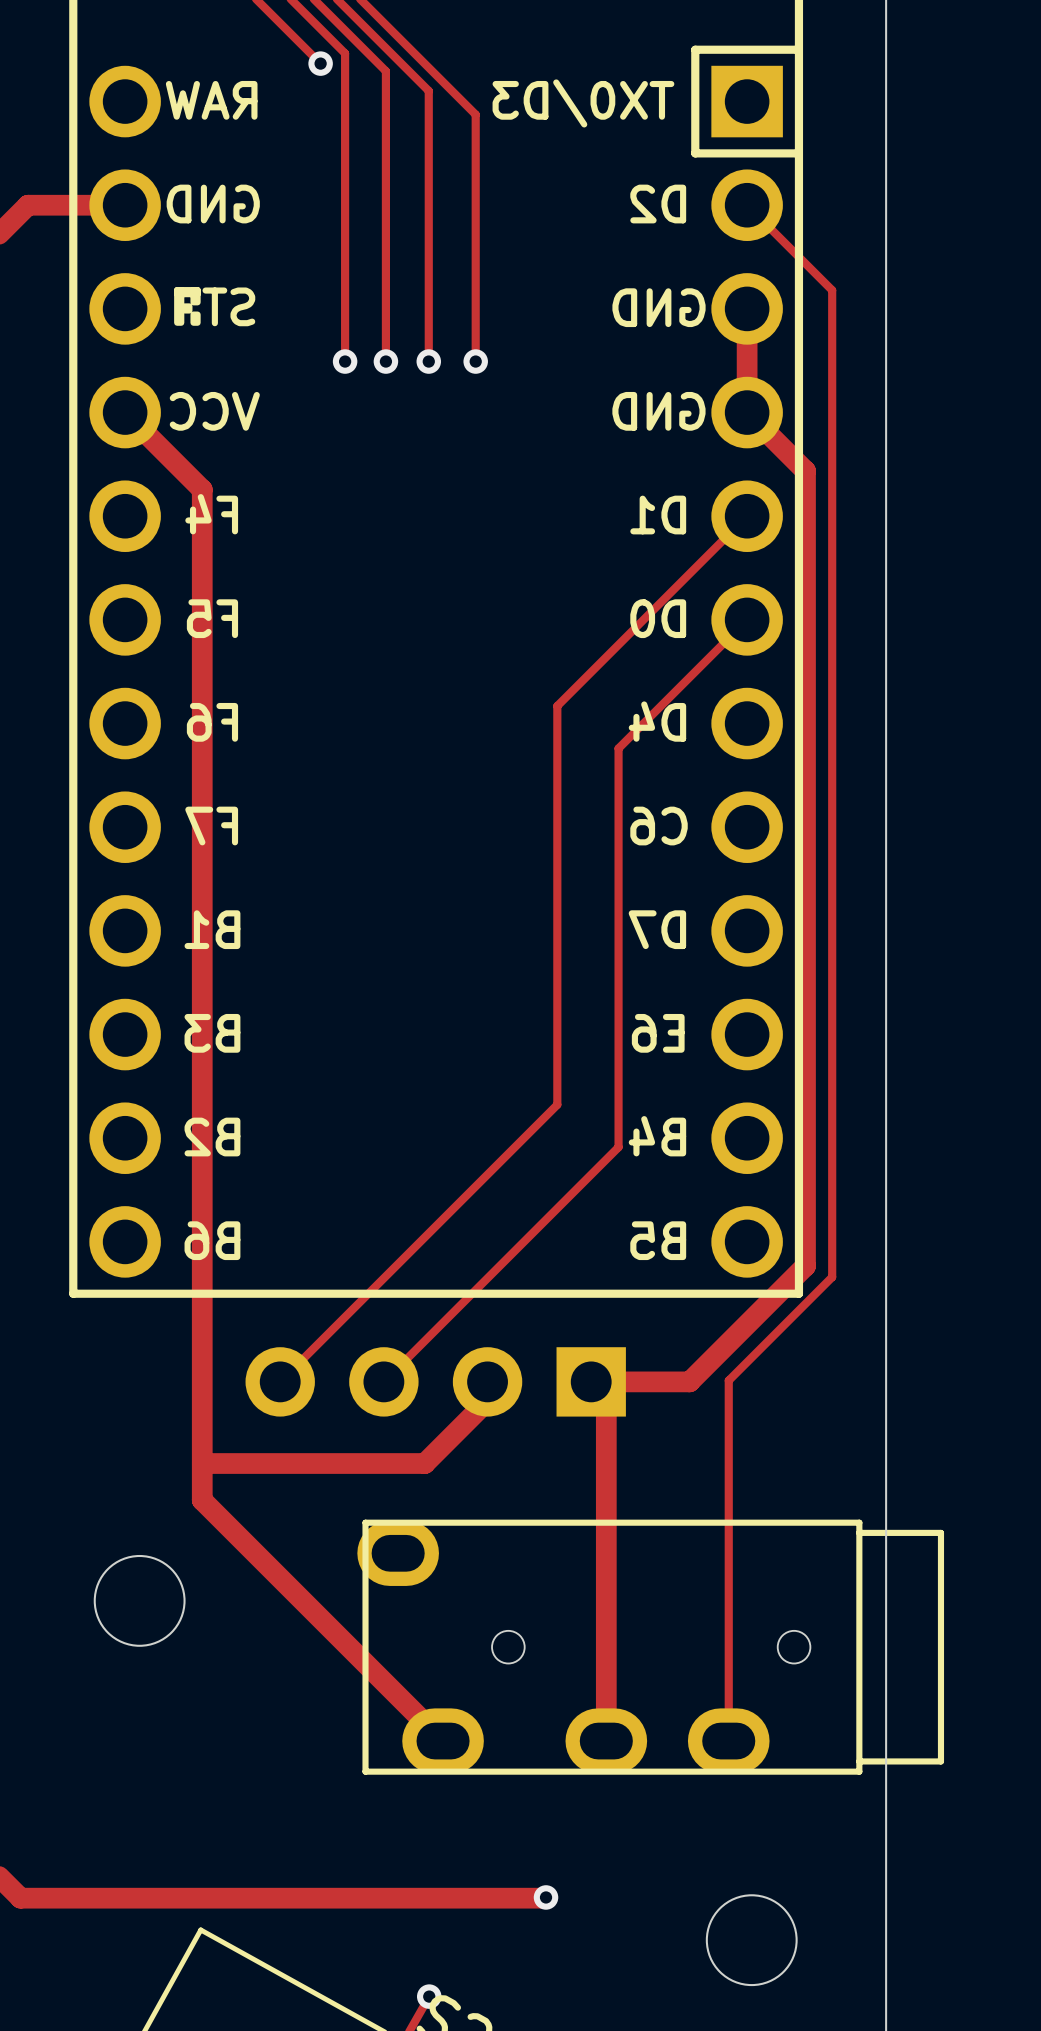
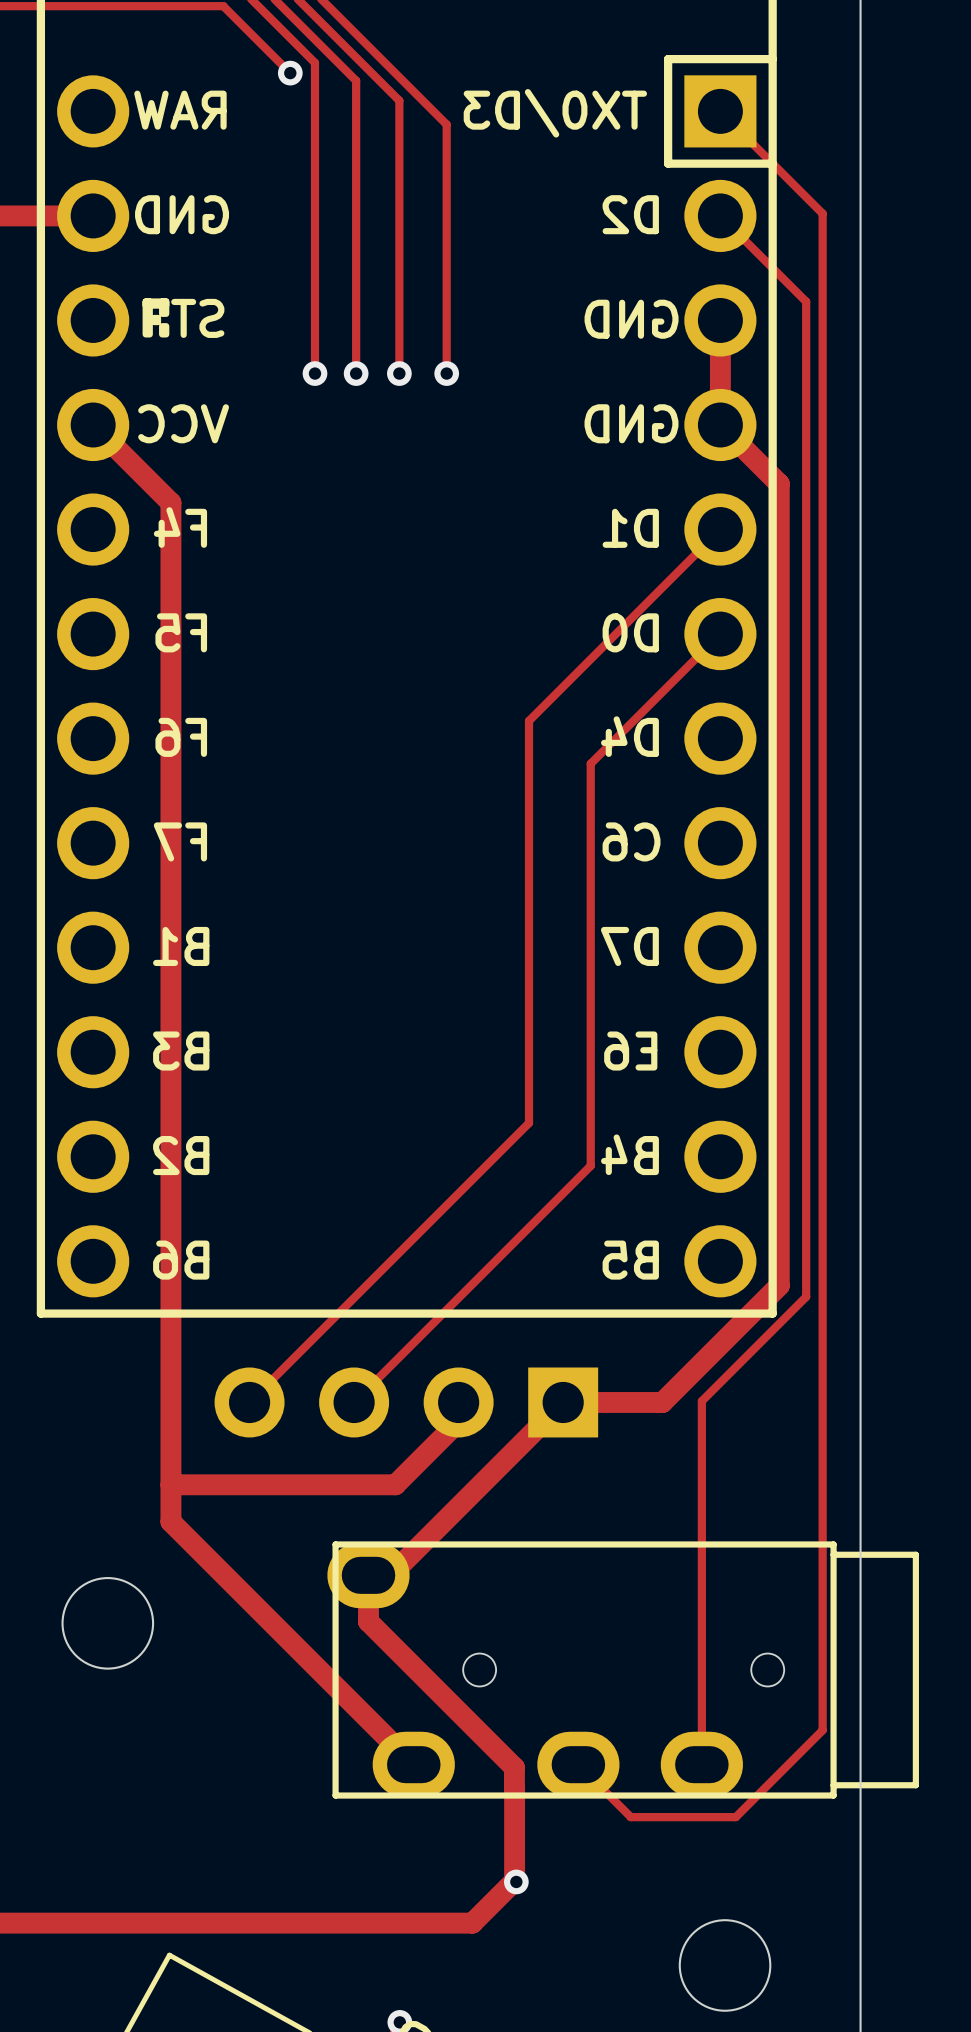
track: (606, 1396) (606, 1741) -> (720, 111) (822, 213) (822, 1730) (735, 1817) (630, 1817) (578, 1764)
track: (546, 1897) (501, 1898) -> (563, 1402) (390, 1575) (368, 1575) (368, 1621) (514, 1767) (514, 1880) (472, 1923)
via position: (546, 1897) -> (516, 1881)

